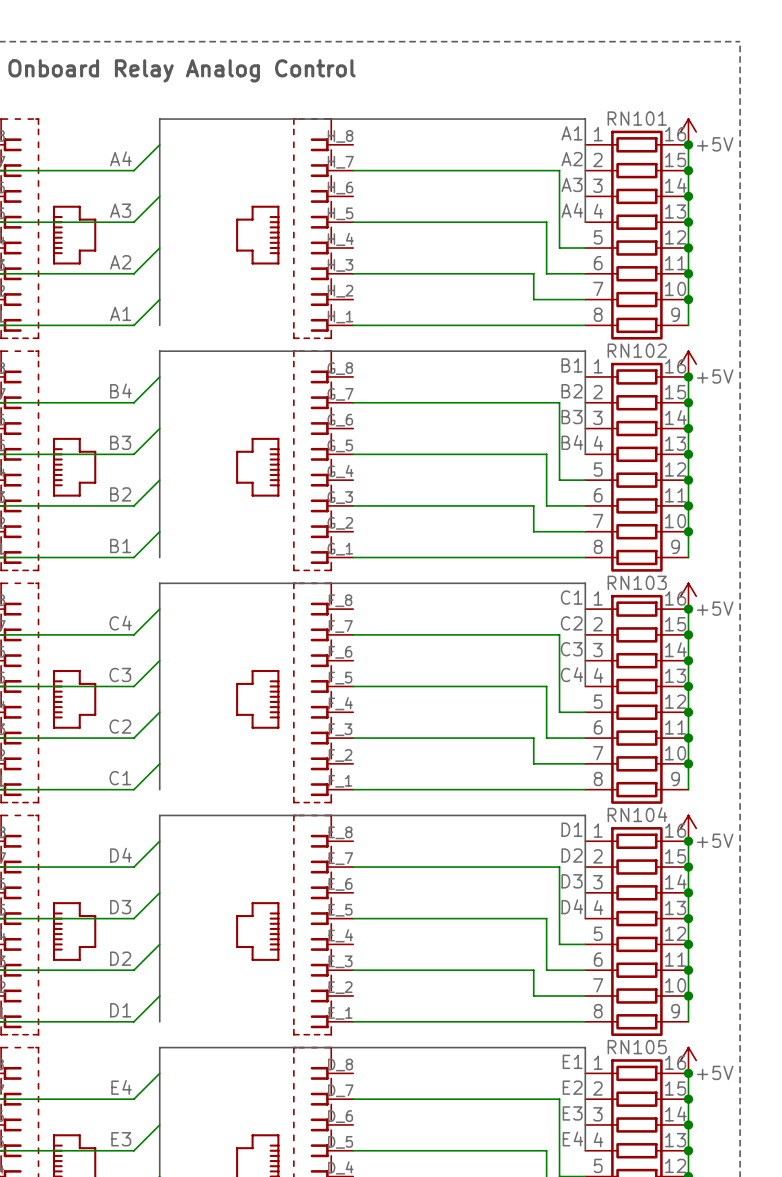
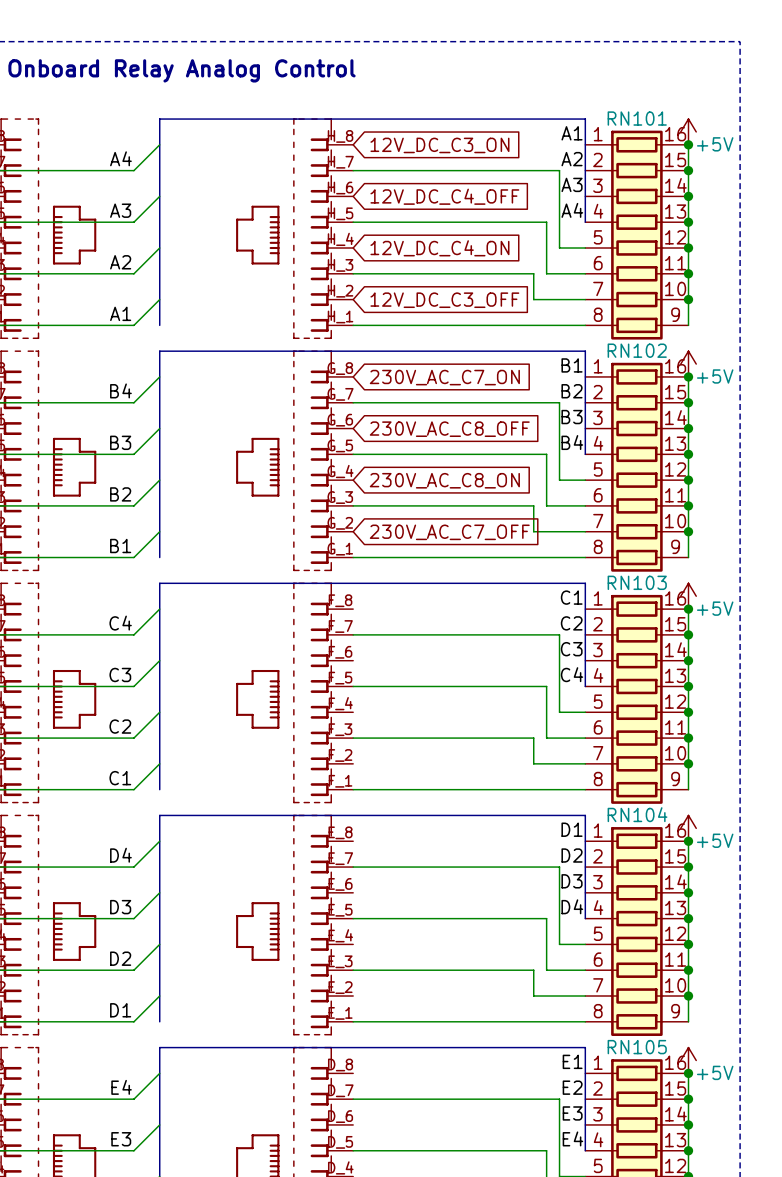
global label: none -> 12V_DC_C3_ON (439, 145)
global label: none -> 12V_DC_C4_OFF (444, 196)
global label: none -> 12V_DC_C4_ON (439, 248)
global label: none -> 12V_DC_C3_OFF (444, 300)
global label: none -> 230V_AC_C7_ON (444, 377)
global label: none -> 230V_AC_C8_OFF (449, 429)
global label: none -> 230V_AC_C8_ON (444, 480)
global label: none -> 230V_AC_C7_OFF (449, 532)

